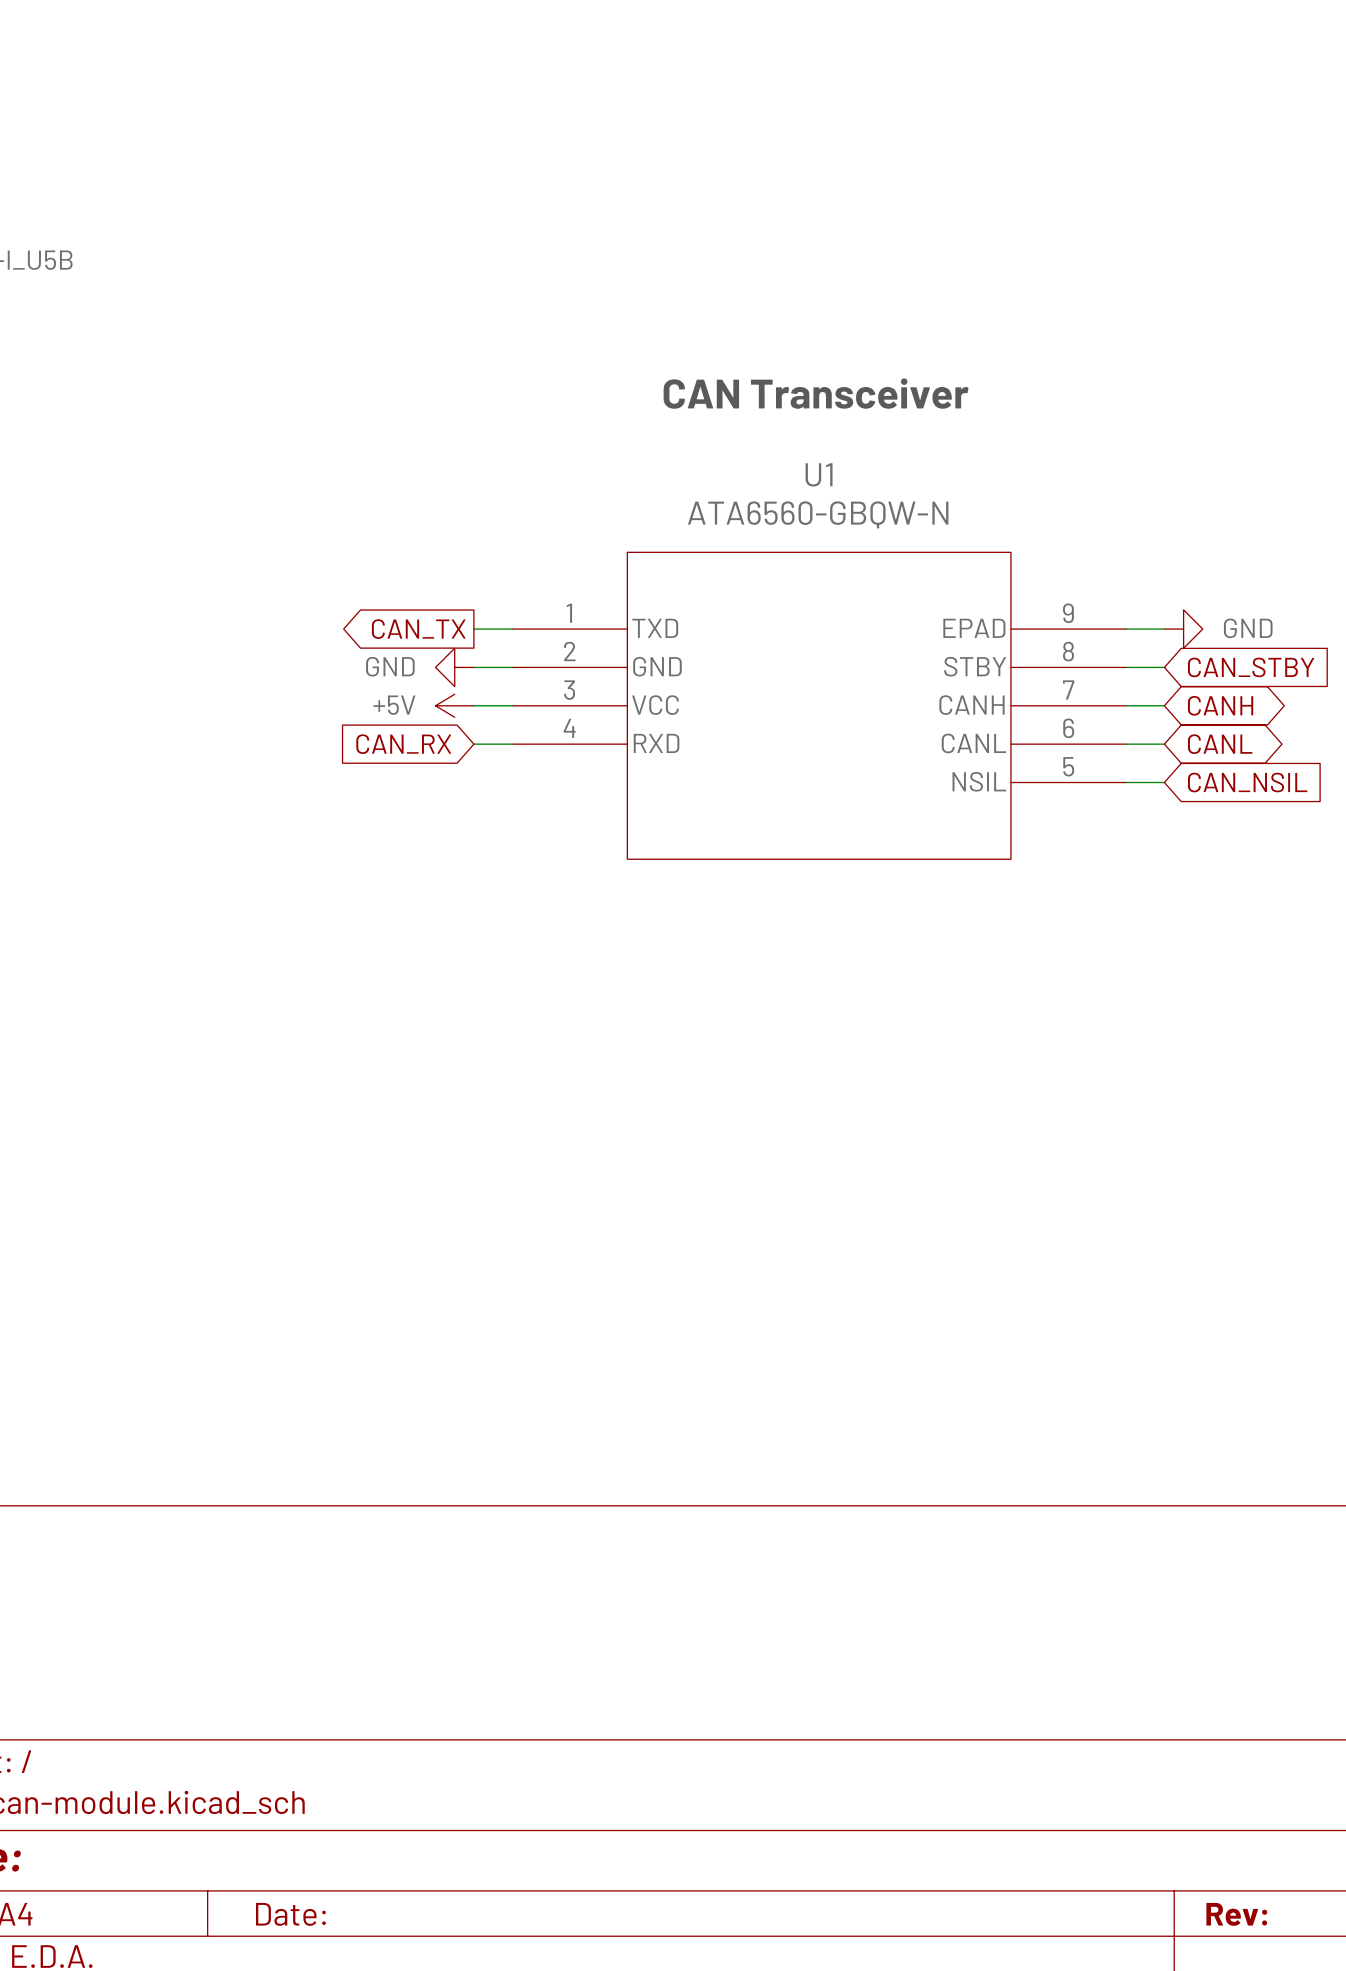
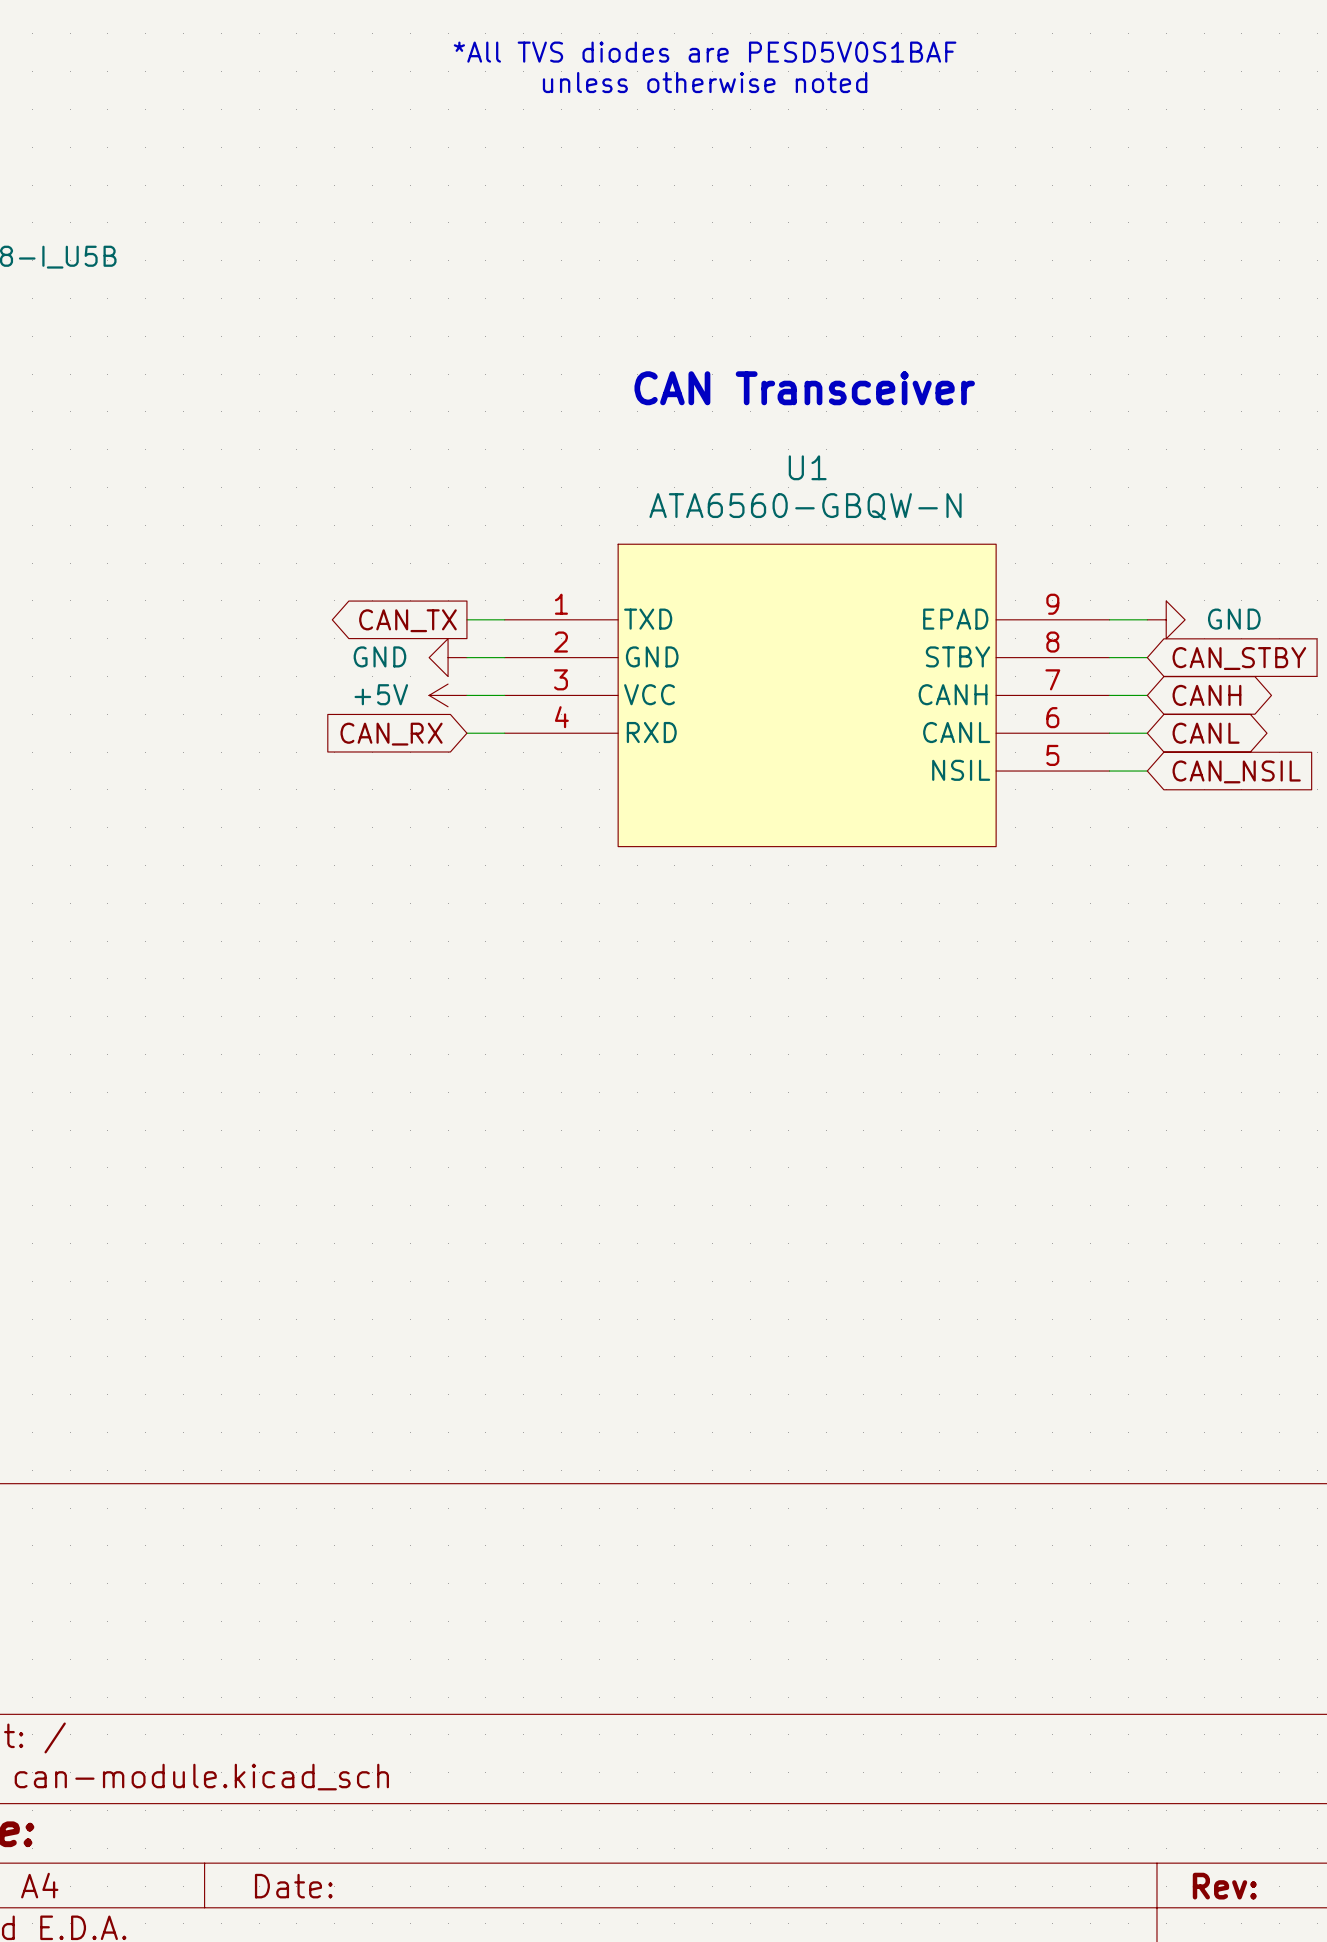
text: none -> *All TVS diodes are PESD5V0S1BAF (705, 52)
text: none -> unless otherwise noted (705, 82)

